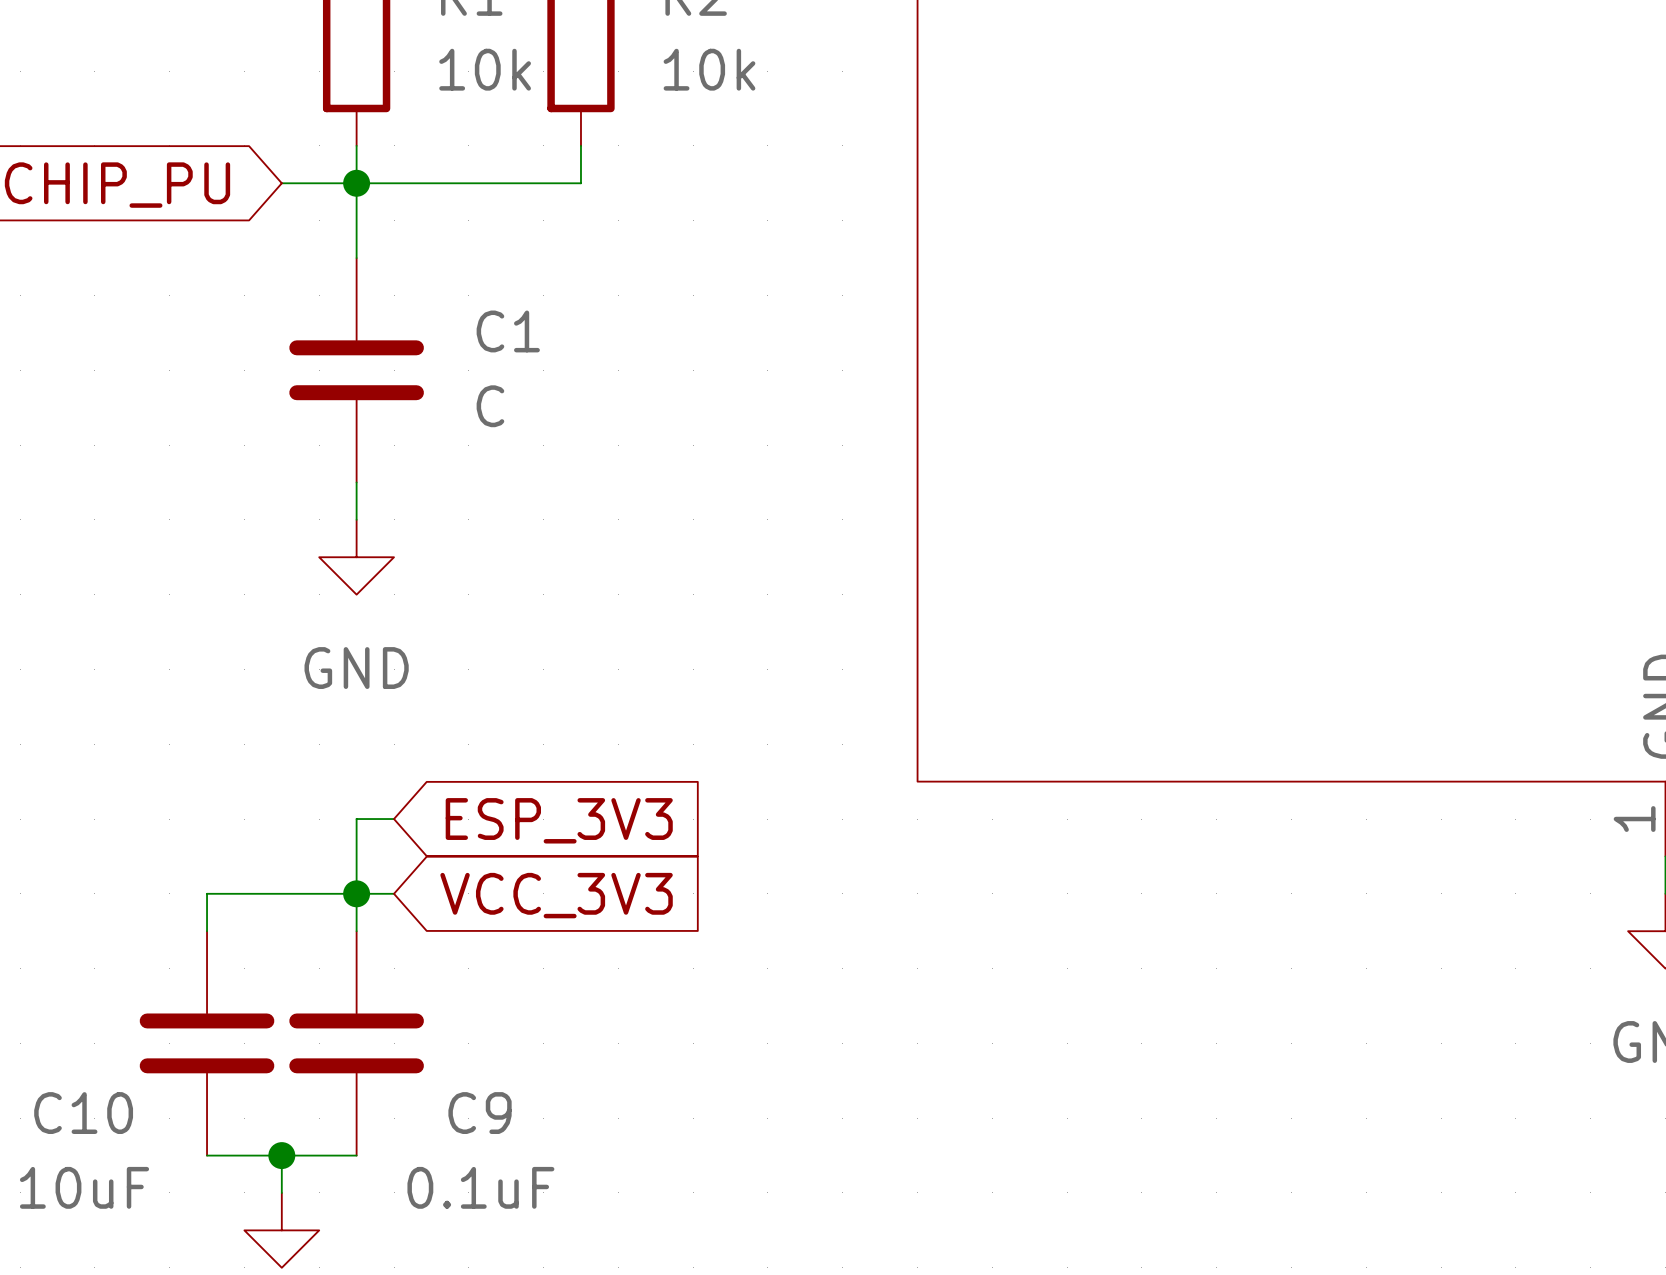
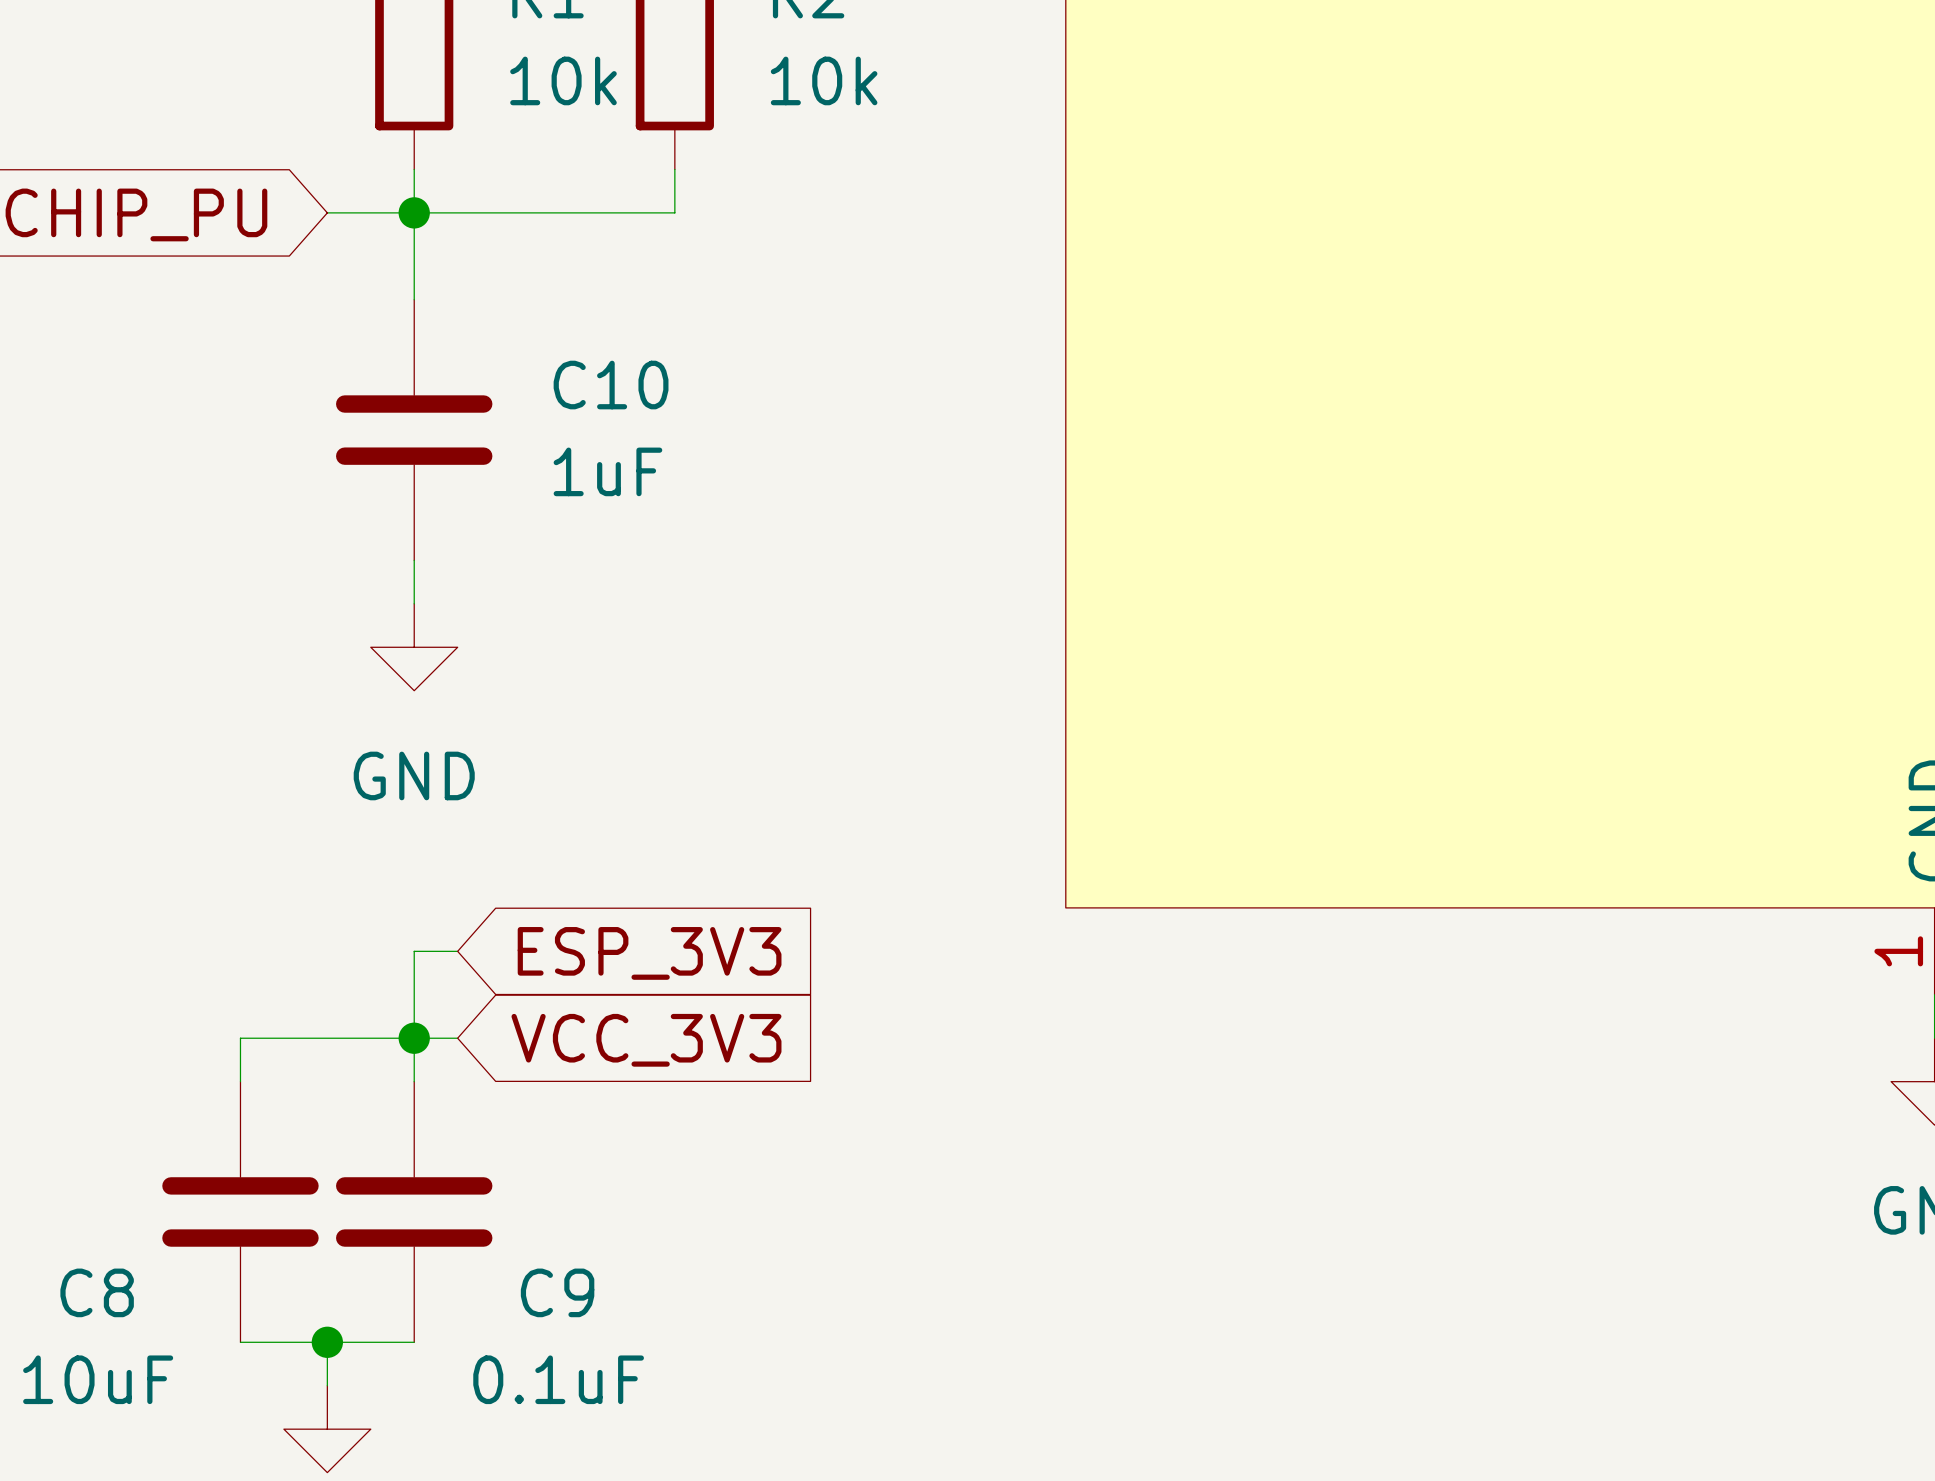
C1 name: C1 (508, 331) -> C10 (611, 385)
C1 value: C (490, 406) -> 1uF (607, 471)
C10 name: C10 (83, 1113) -> C8 (97, 1292)

